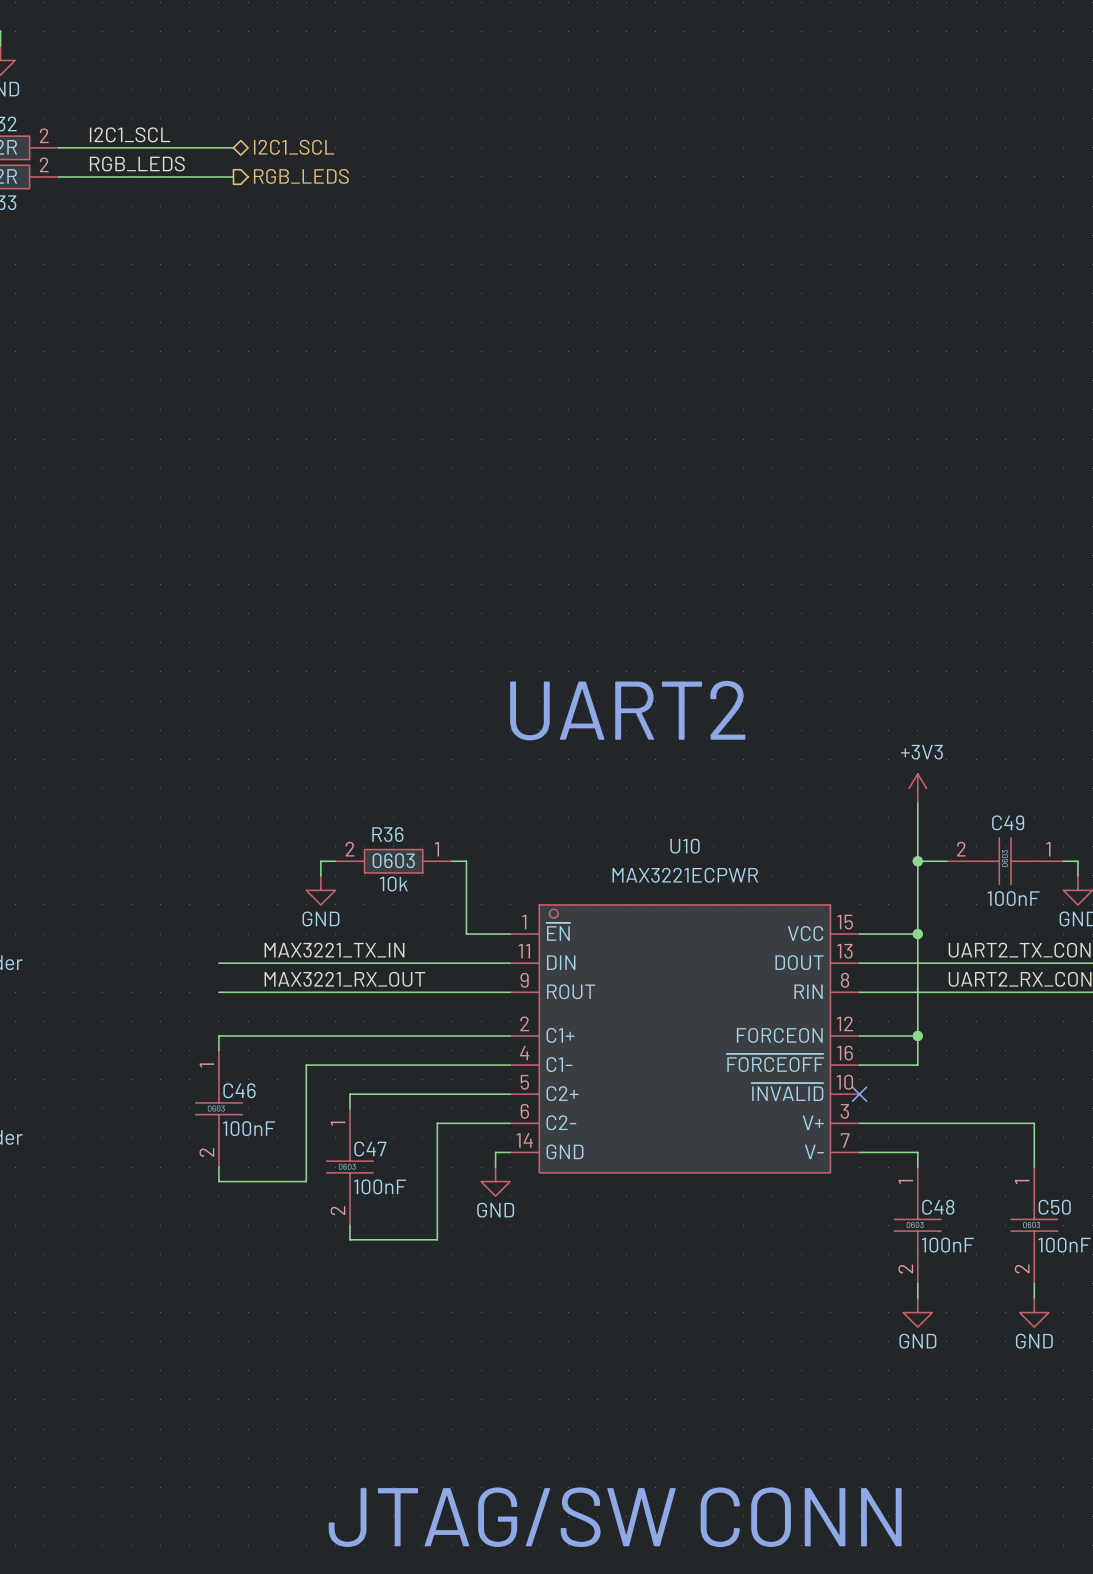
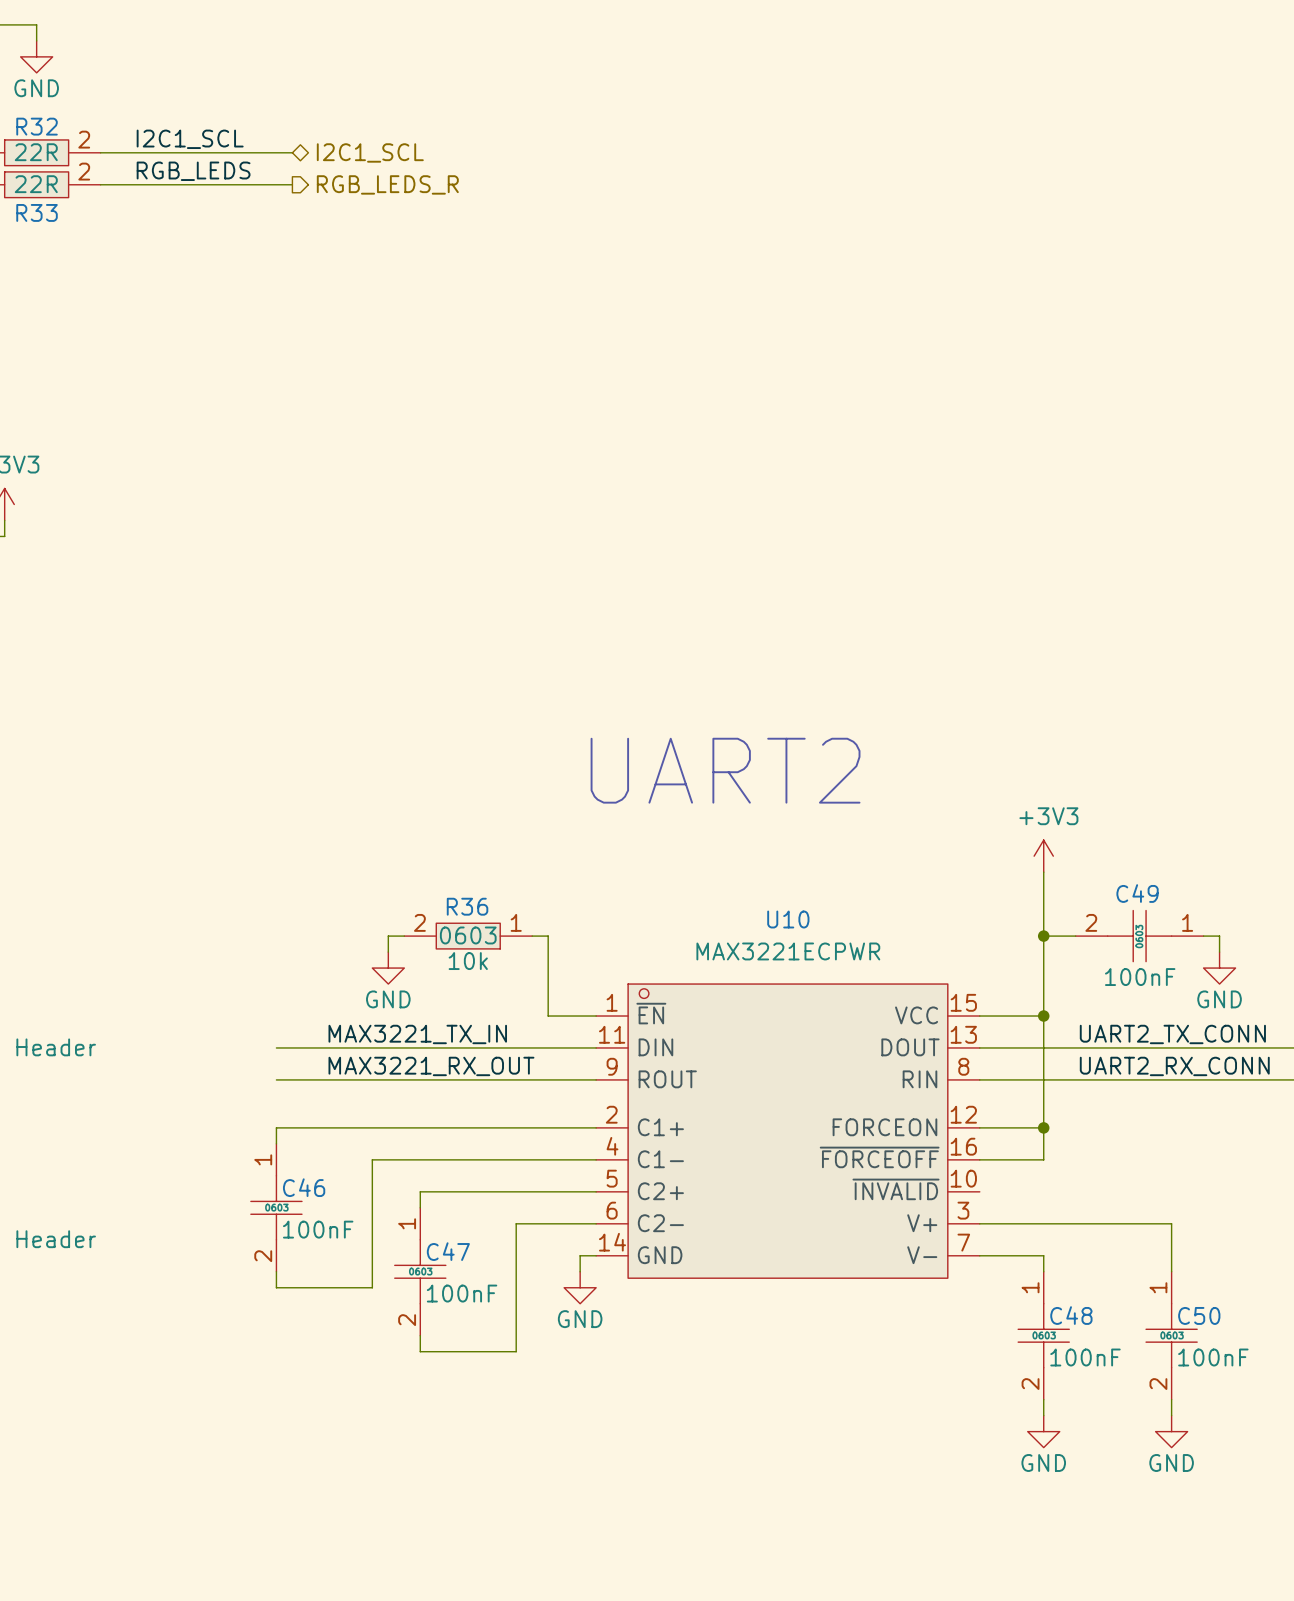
hierarchical label: RGB_LEDS (301, 176) -> RGB_LEDS_R (387, 184)
no-connect mark: (859, 1094) -> none

